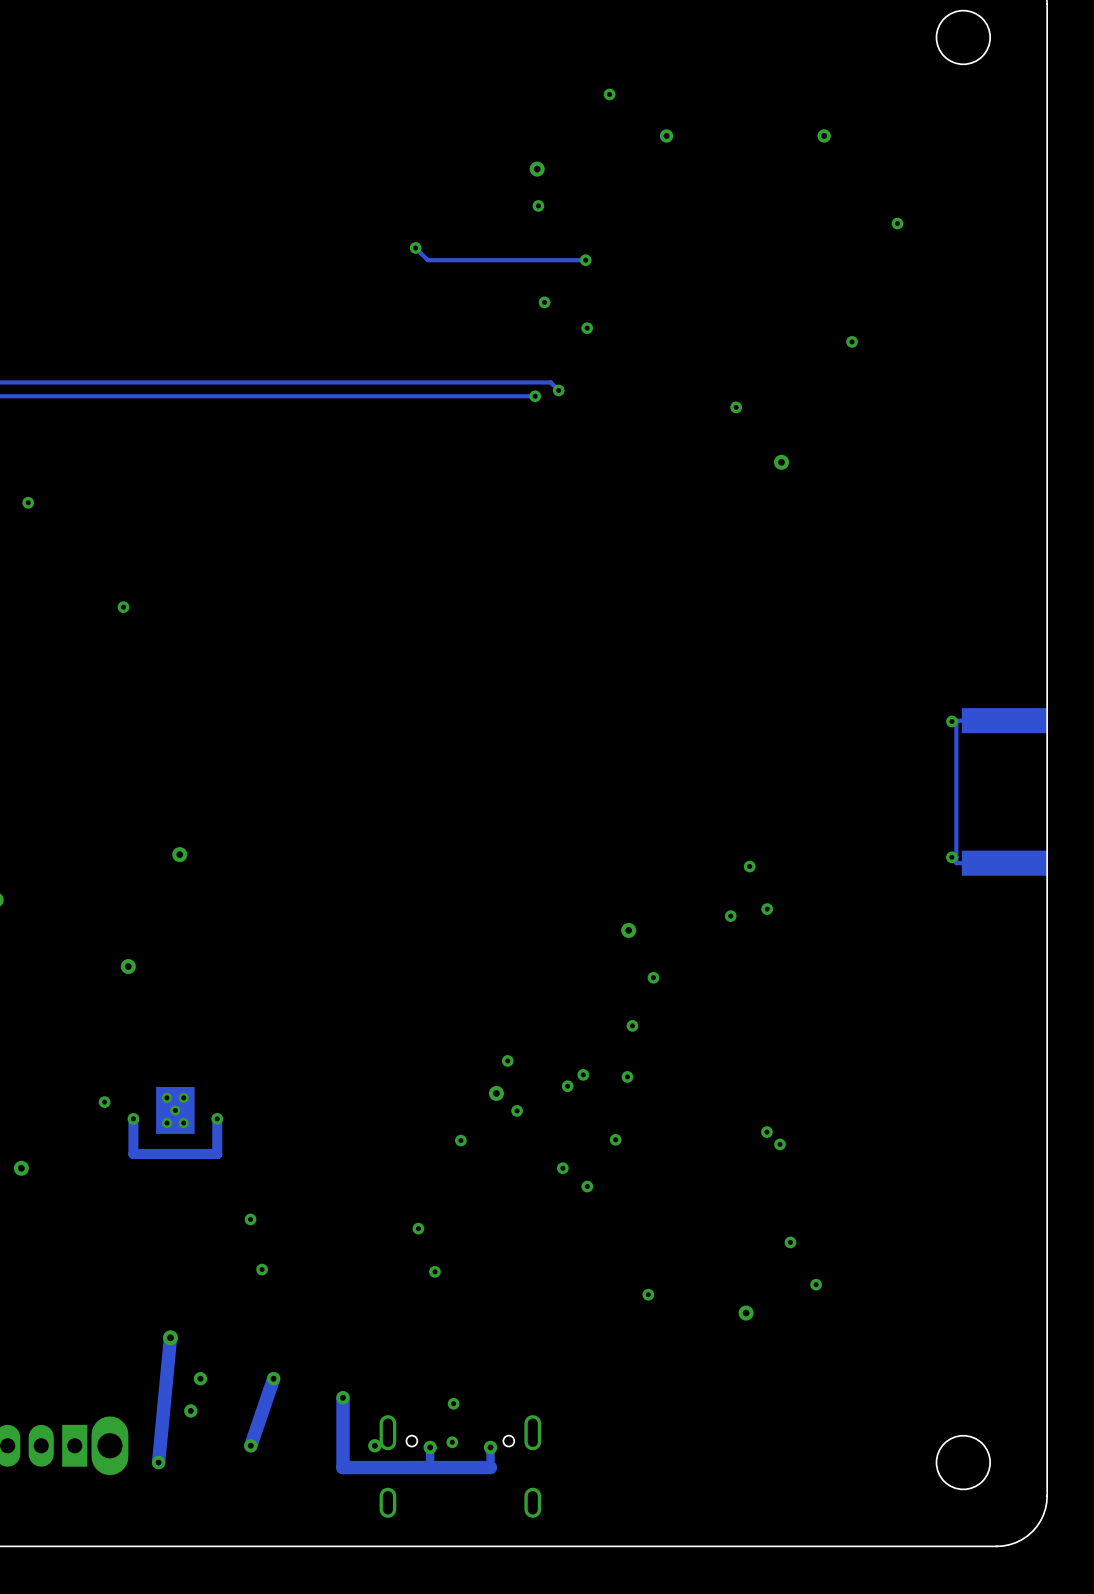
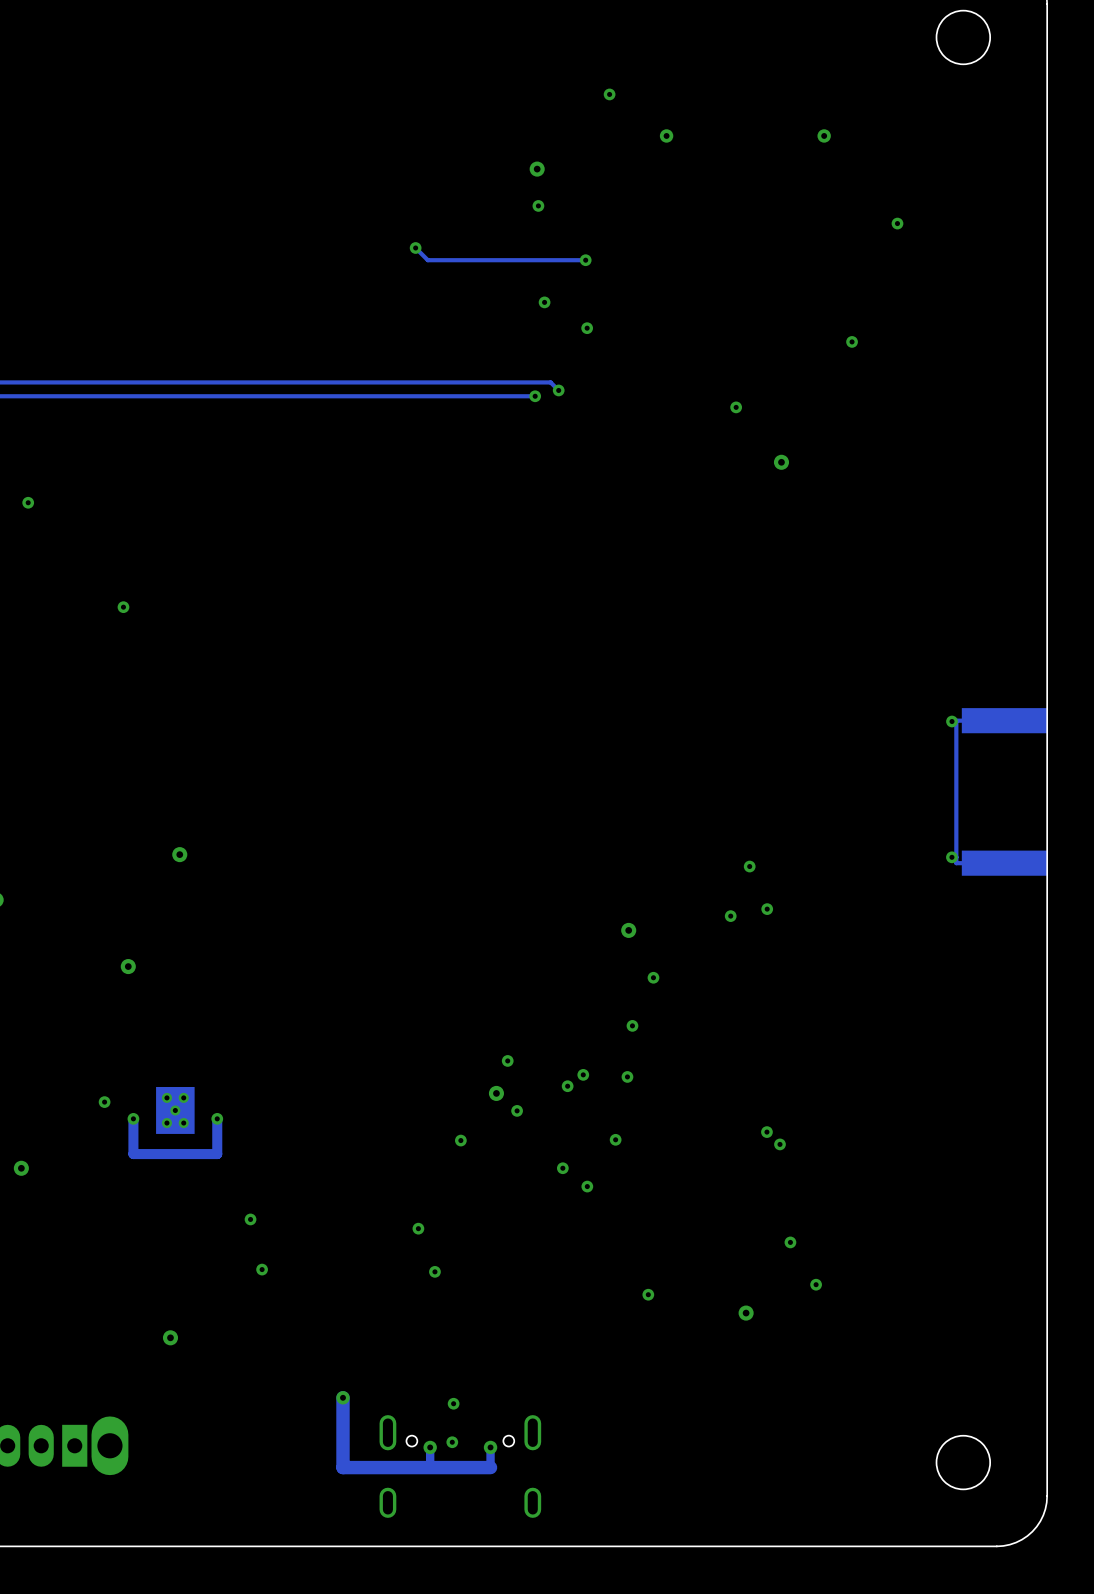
track: (170, 1337) (158, 1462) -> none
via: (200, 1378) -> none
track: (273, 1378) (250, 1445) -> none
via: (273, 1378) -> none
via: (190, 1410) -> none
via: (250, 1445) -> none
via: (374, 1445) -> none
via: (158, 1462) -> none

